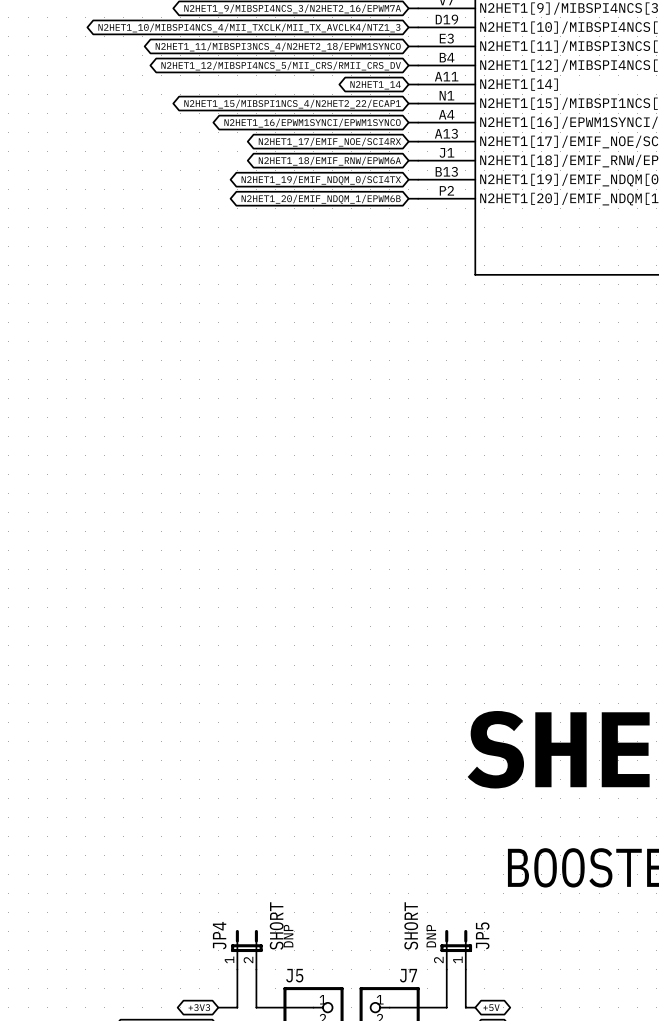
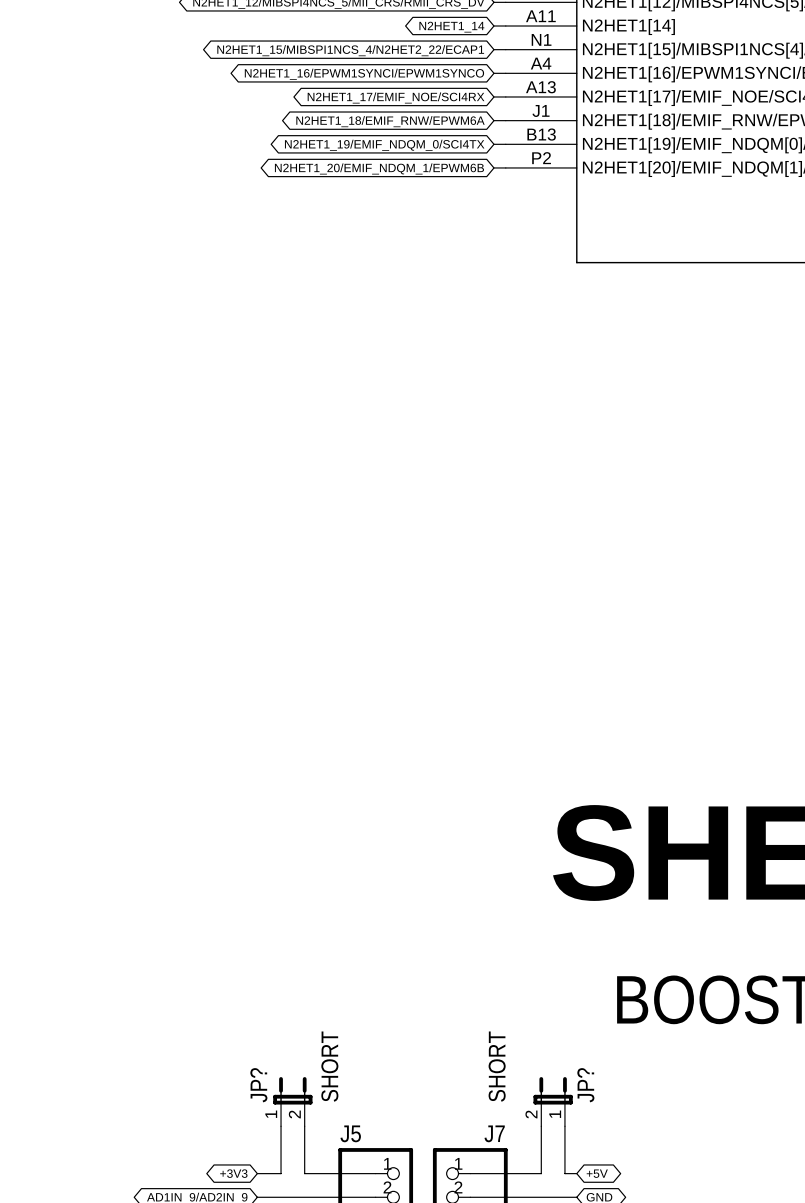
JP4 name: JP4 (219, 935) -> JP? (258, 1085)
JP5 name: JP5 (482, 935) -> JP? (585, 1085)
text: DNP (288, 936) -> none
text: DNP (431, 936) -> none

